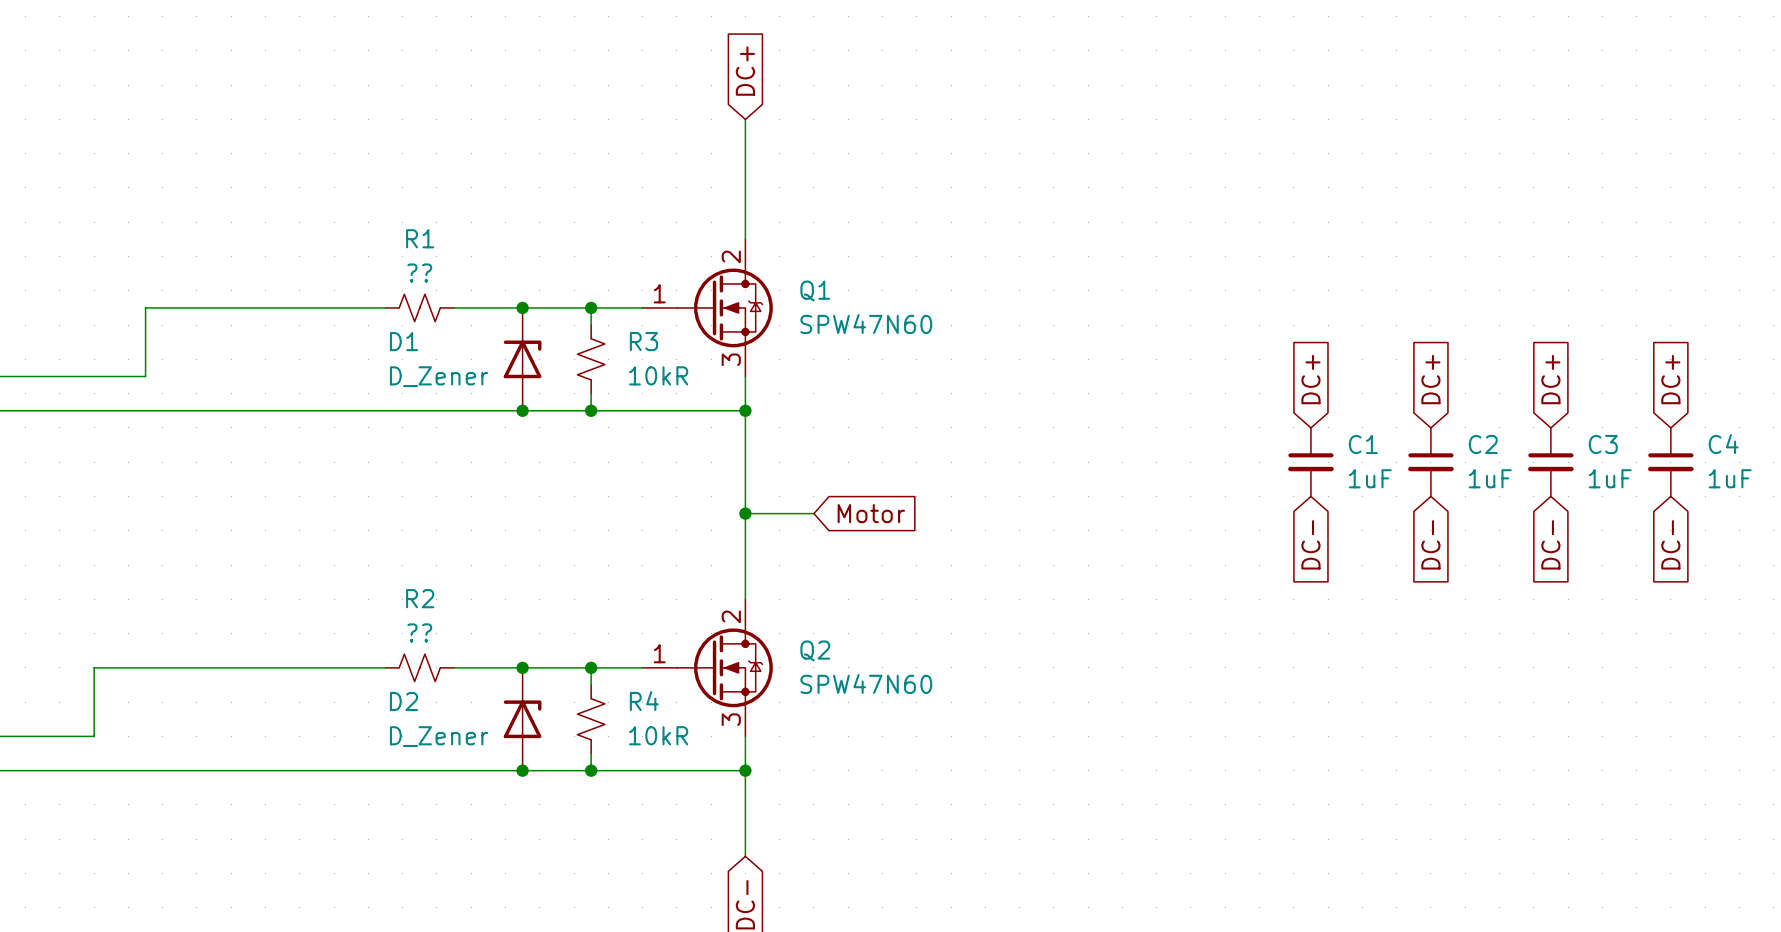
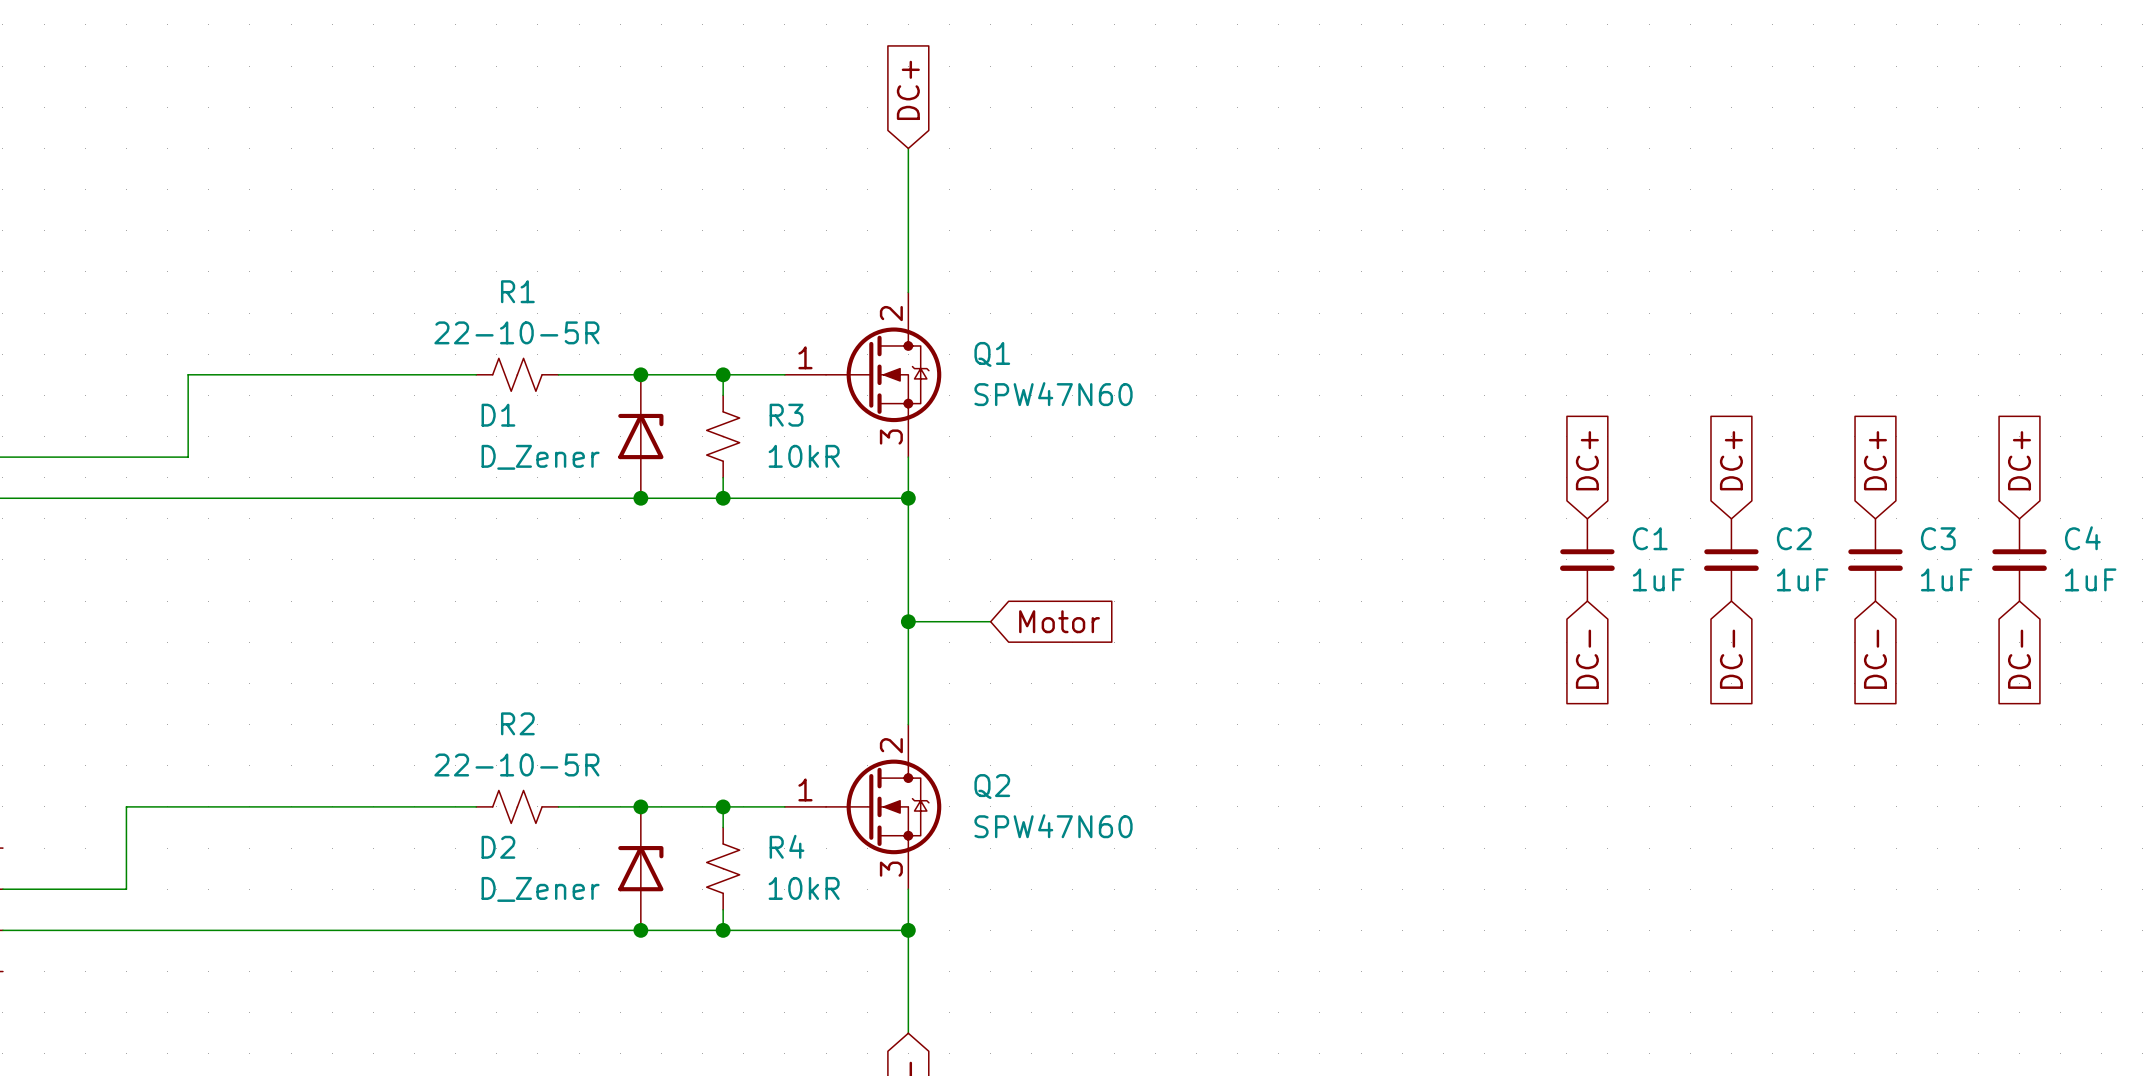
R1 value: ?? (419, 273) -> 22-10-5R (516, 332)
R2 value: ?? (419, 632) -> 22-10-5R (516, 764)

